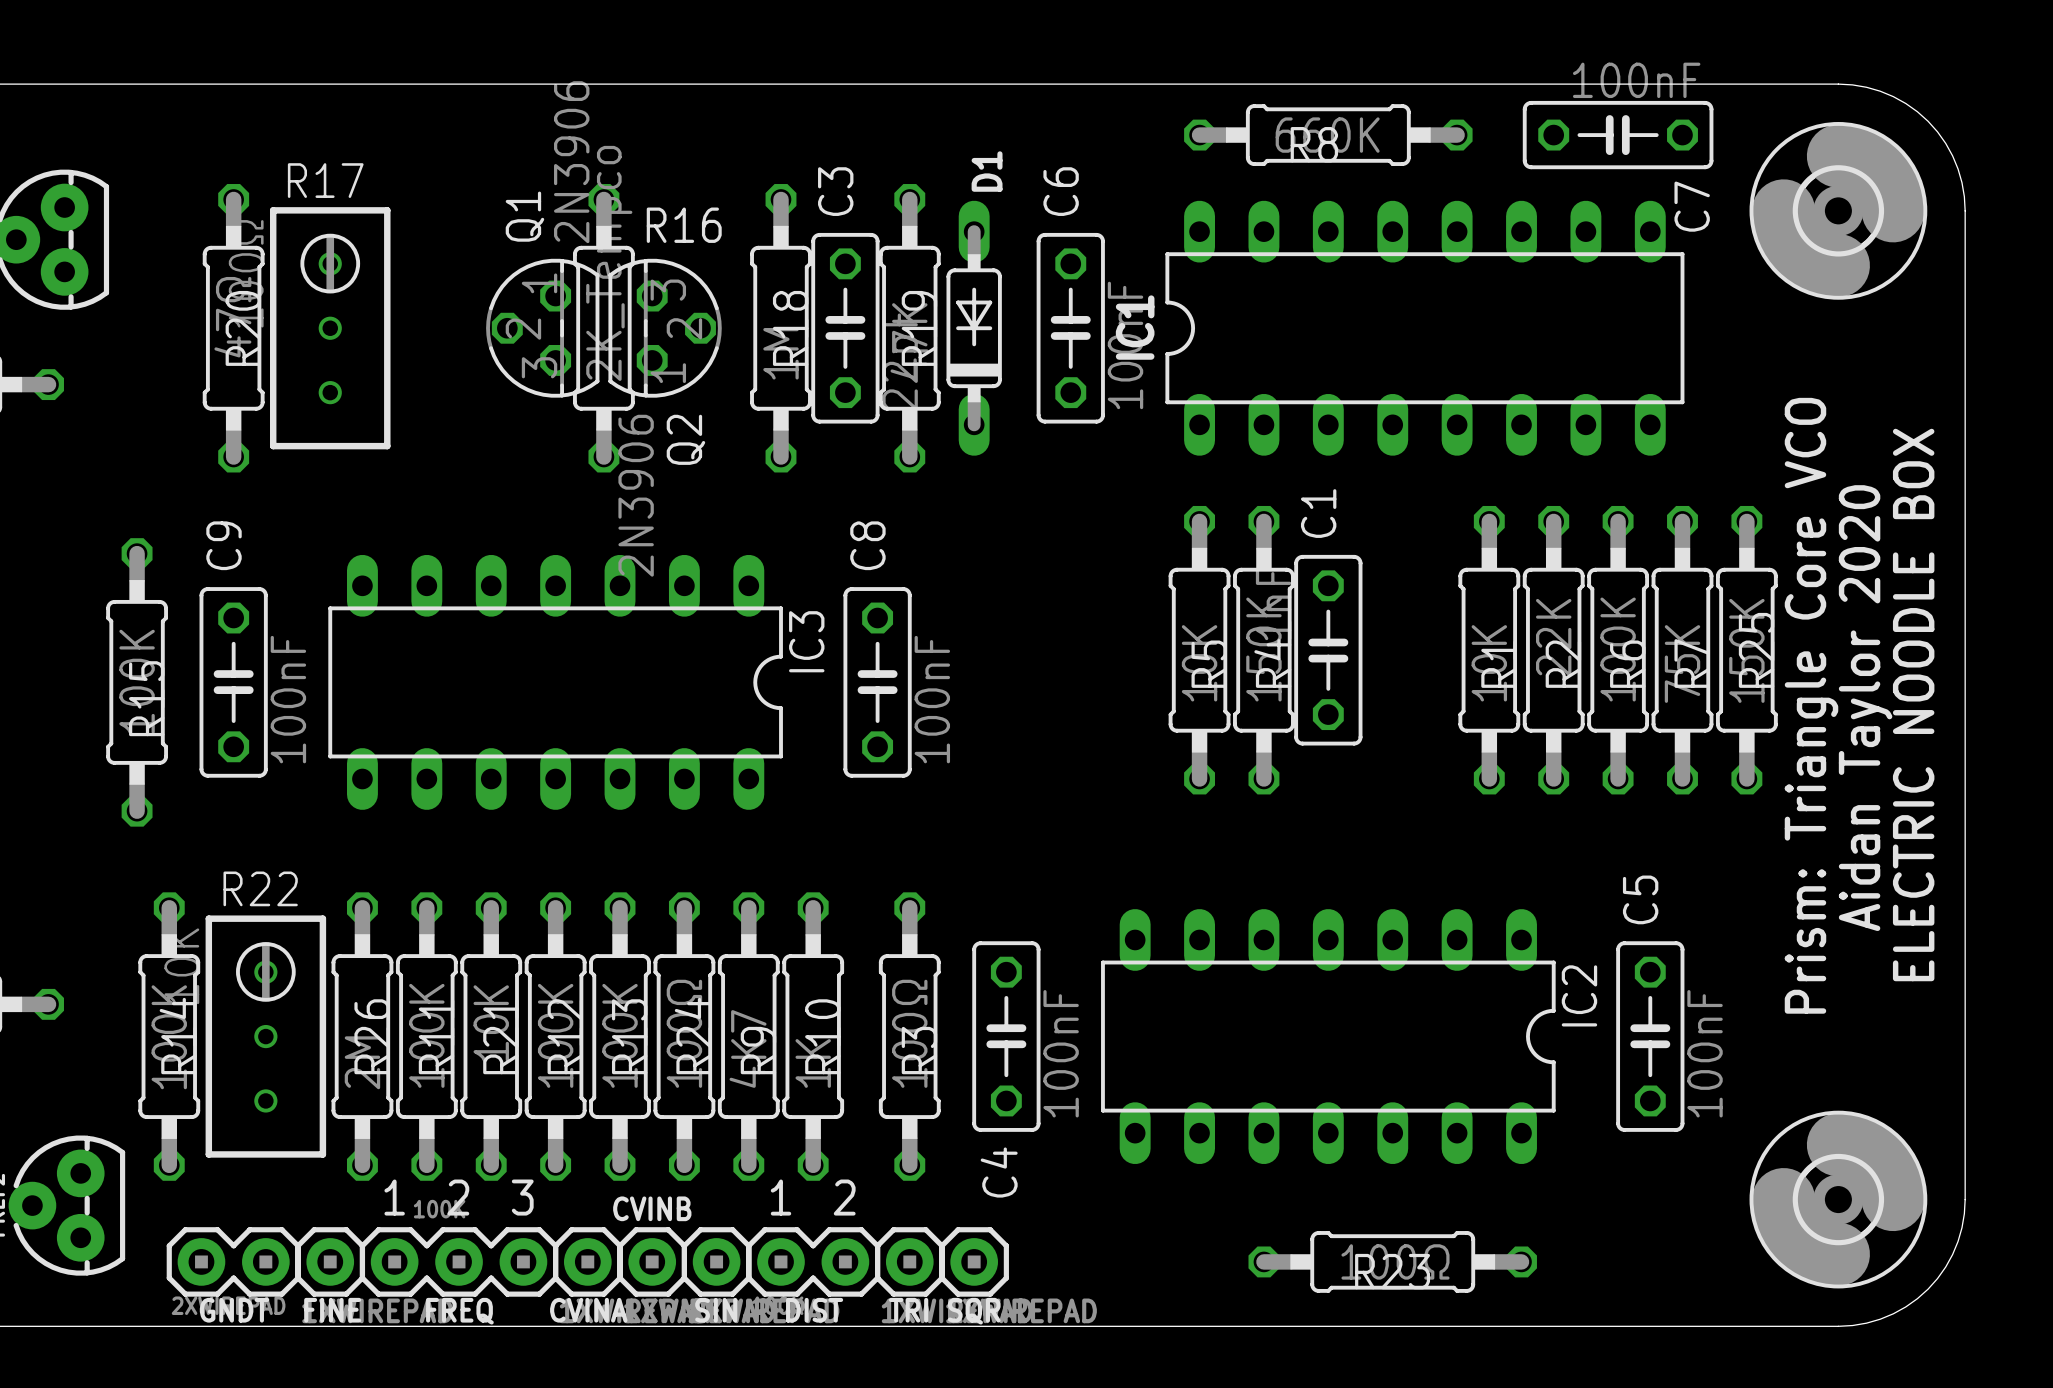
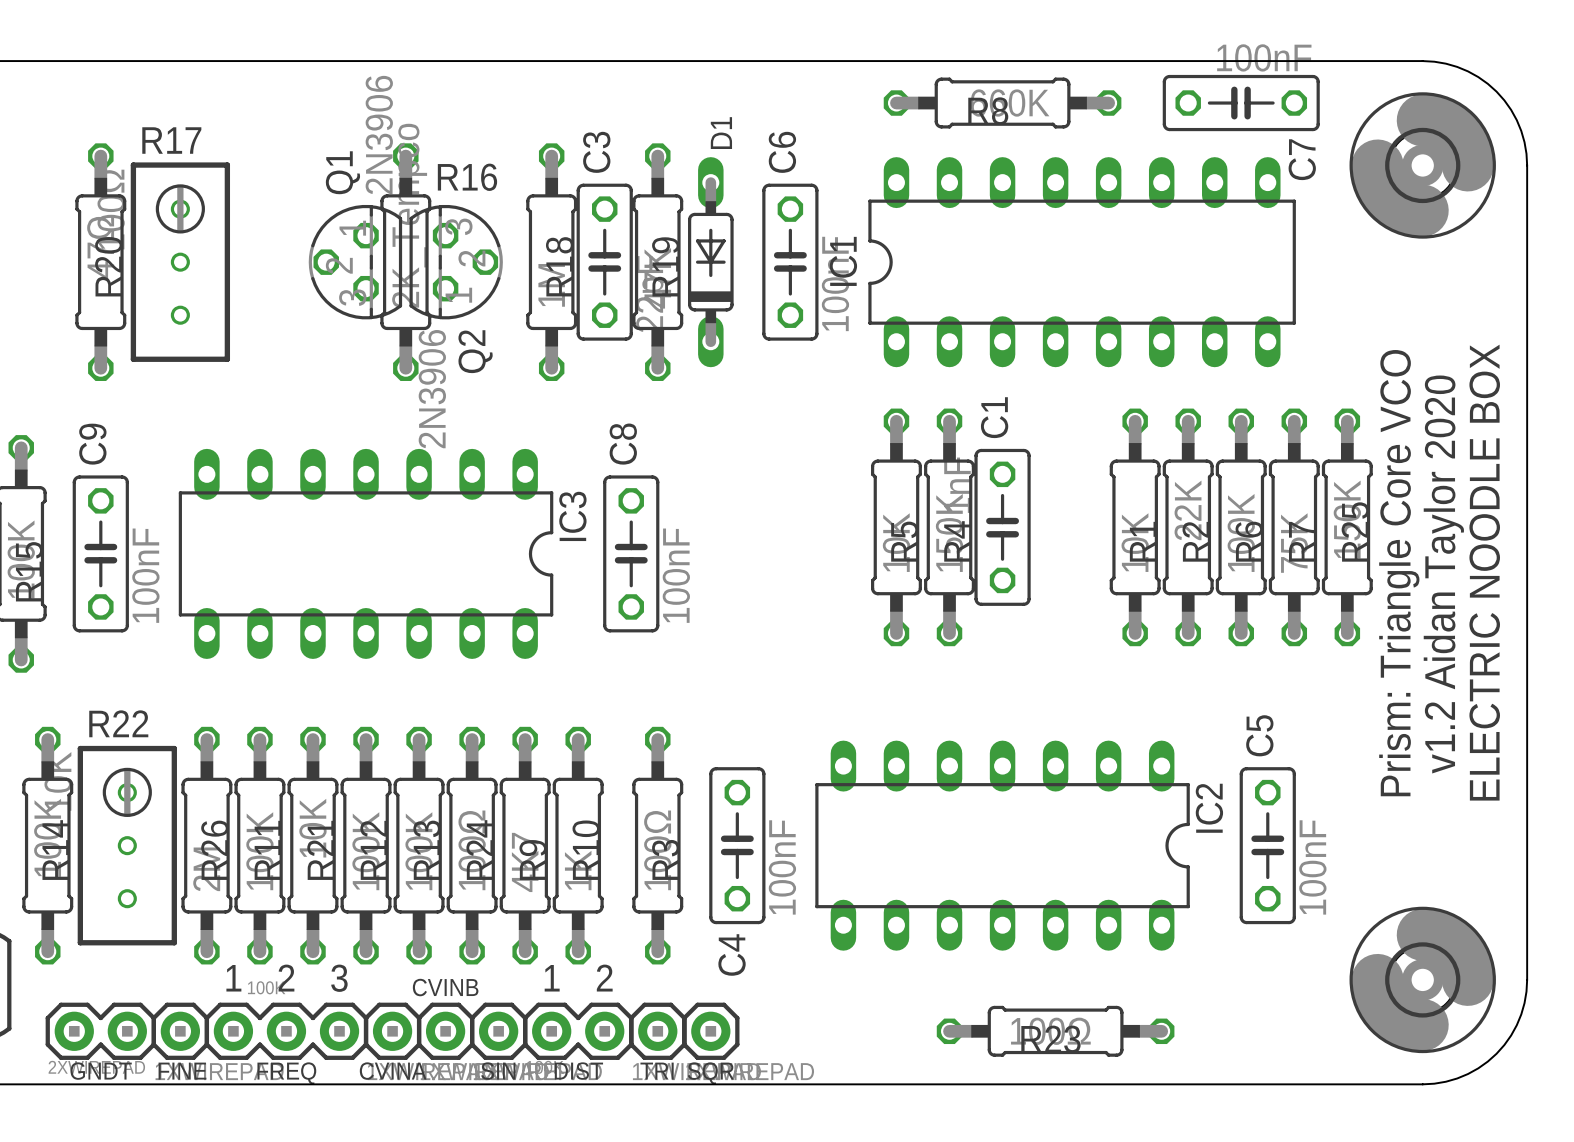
text: Aidan Taylor 2020 (1865, 708) -> v1.2 Aidan Taylor 2020 (1443, 574)

